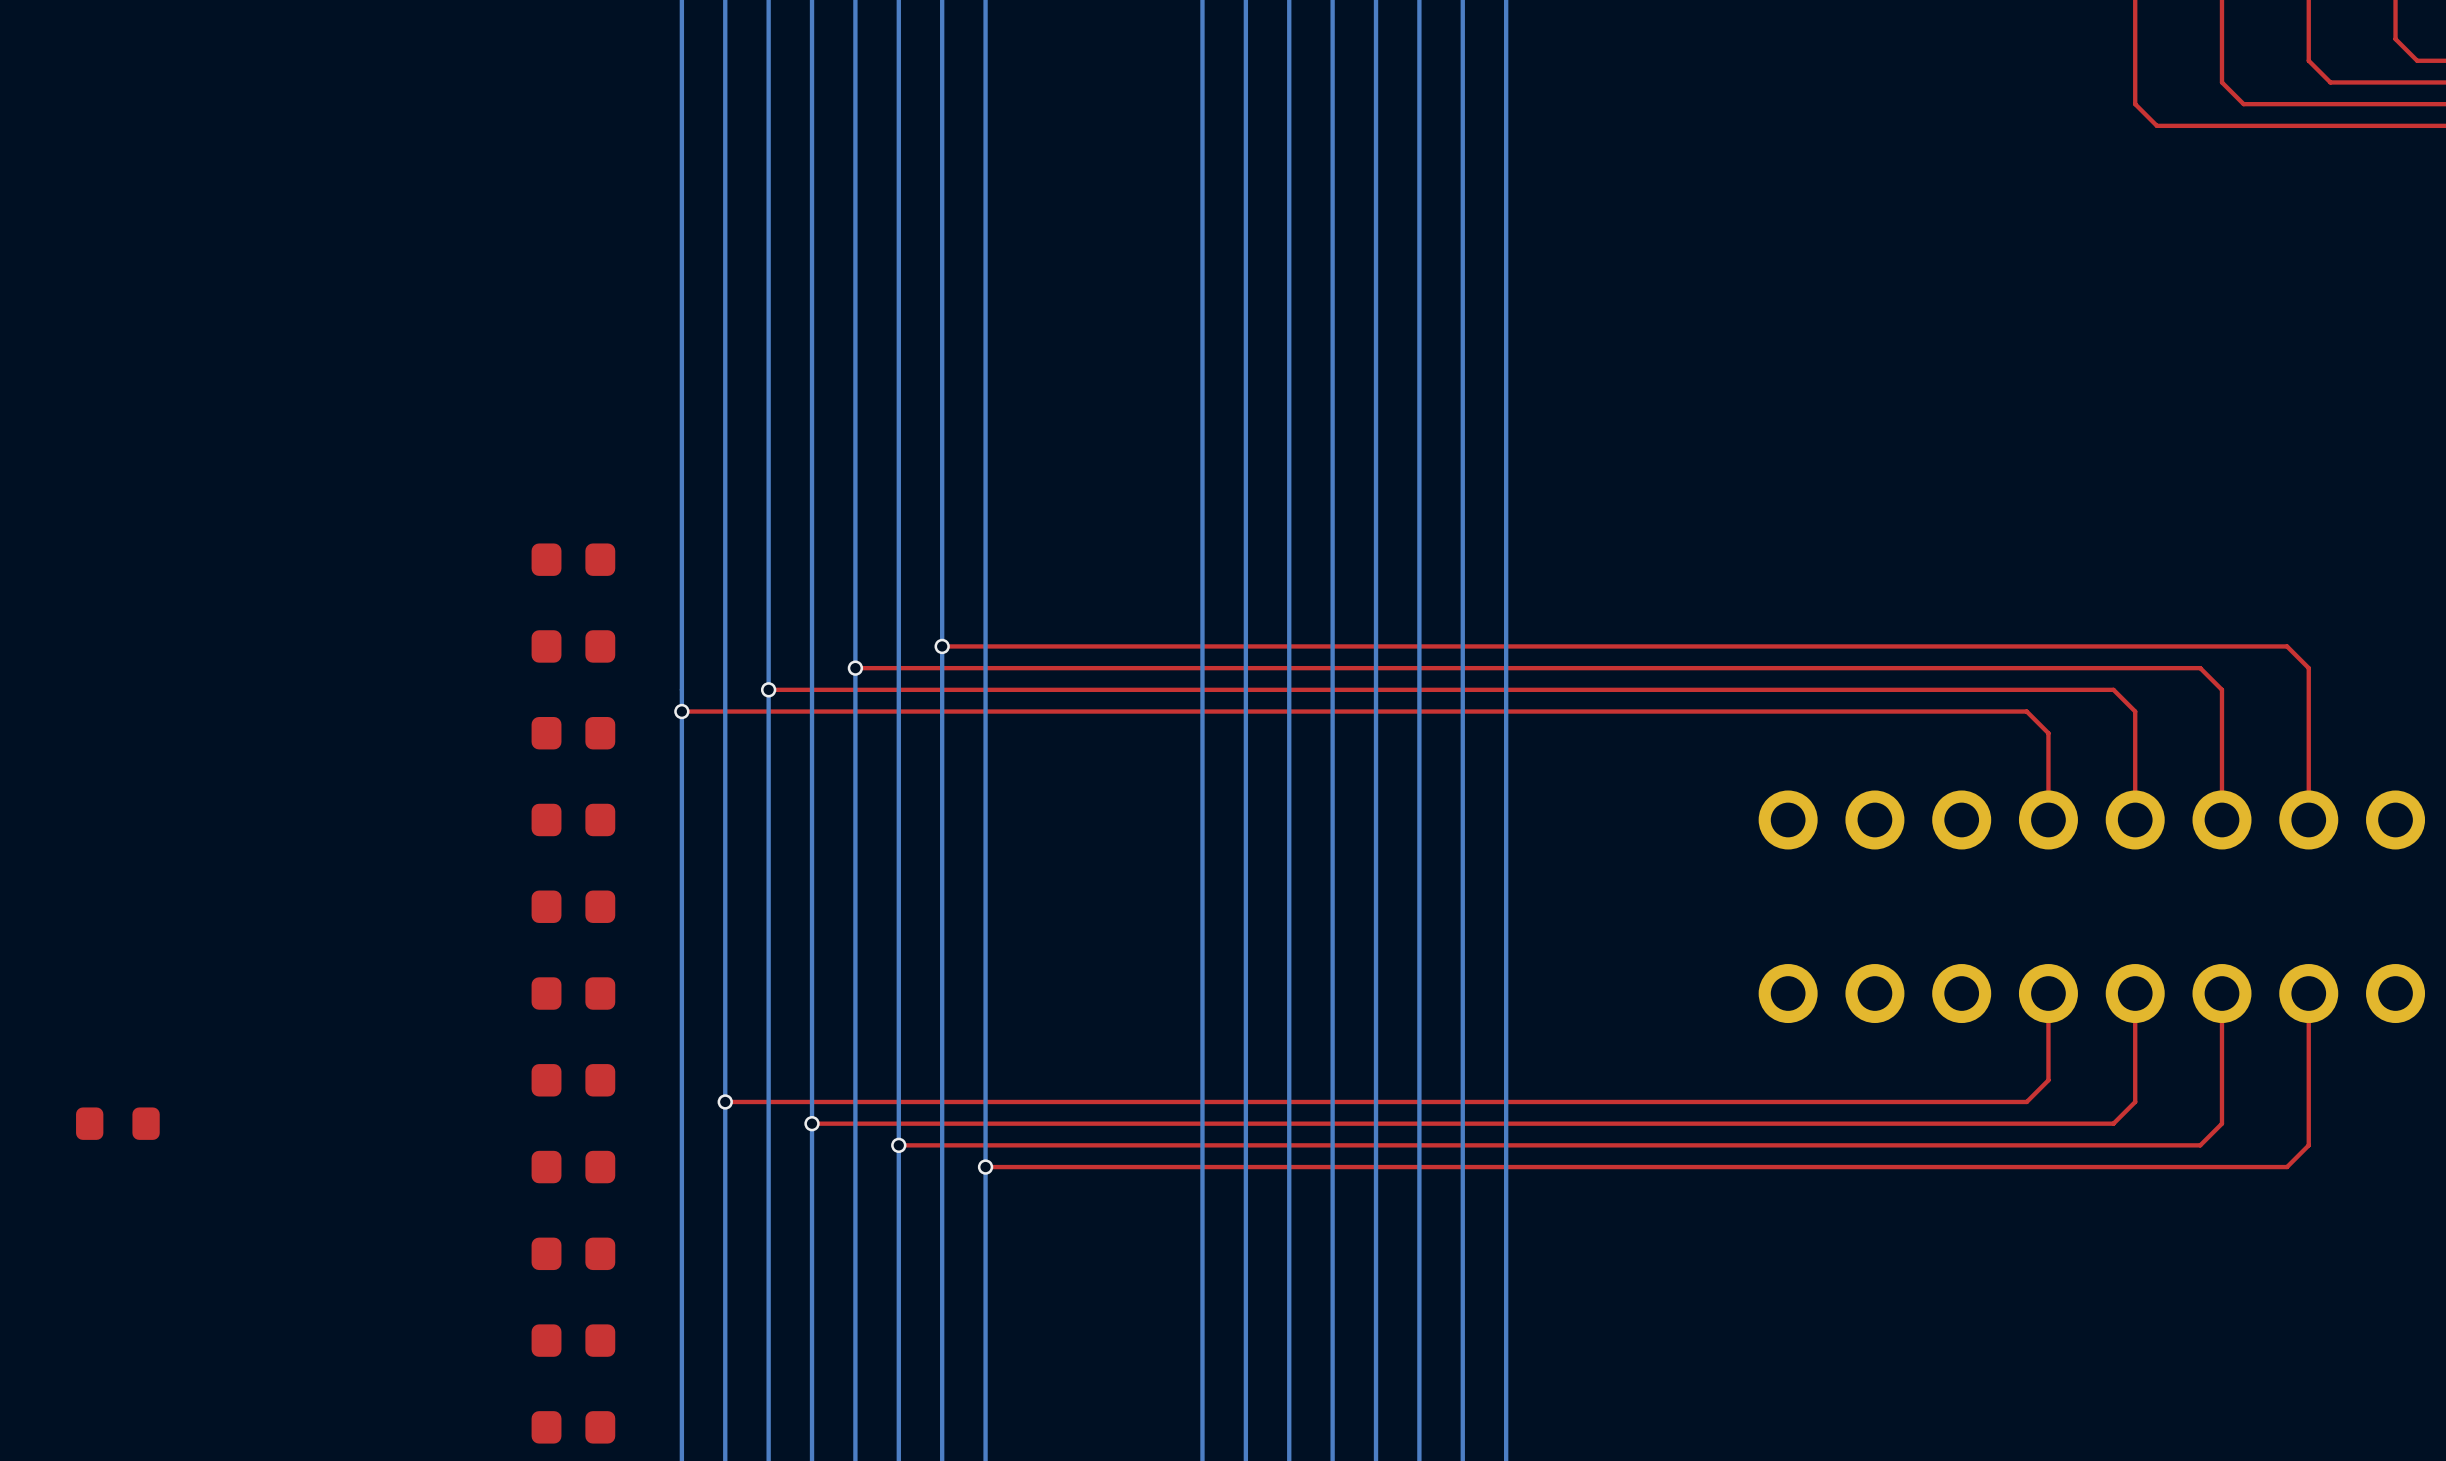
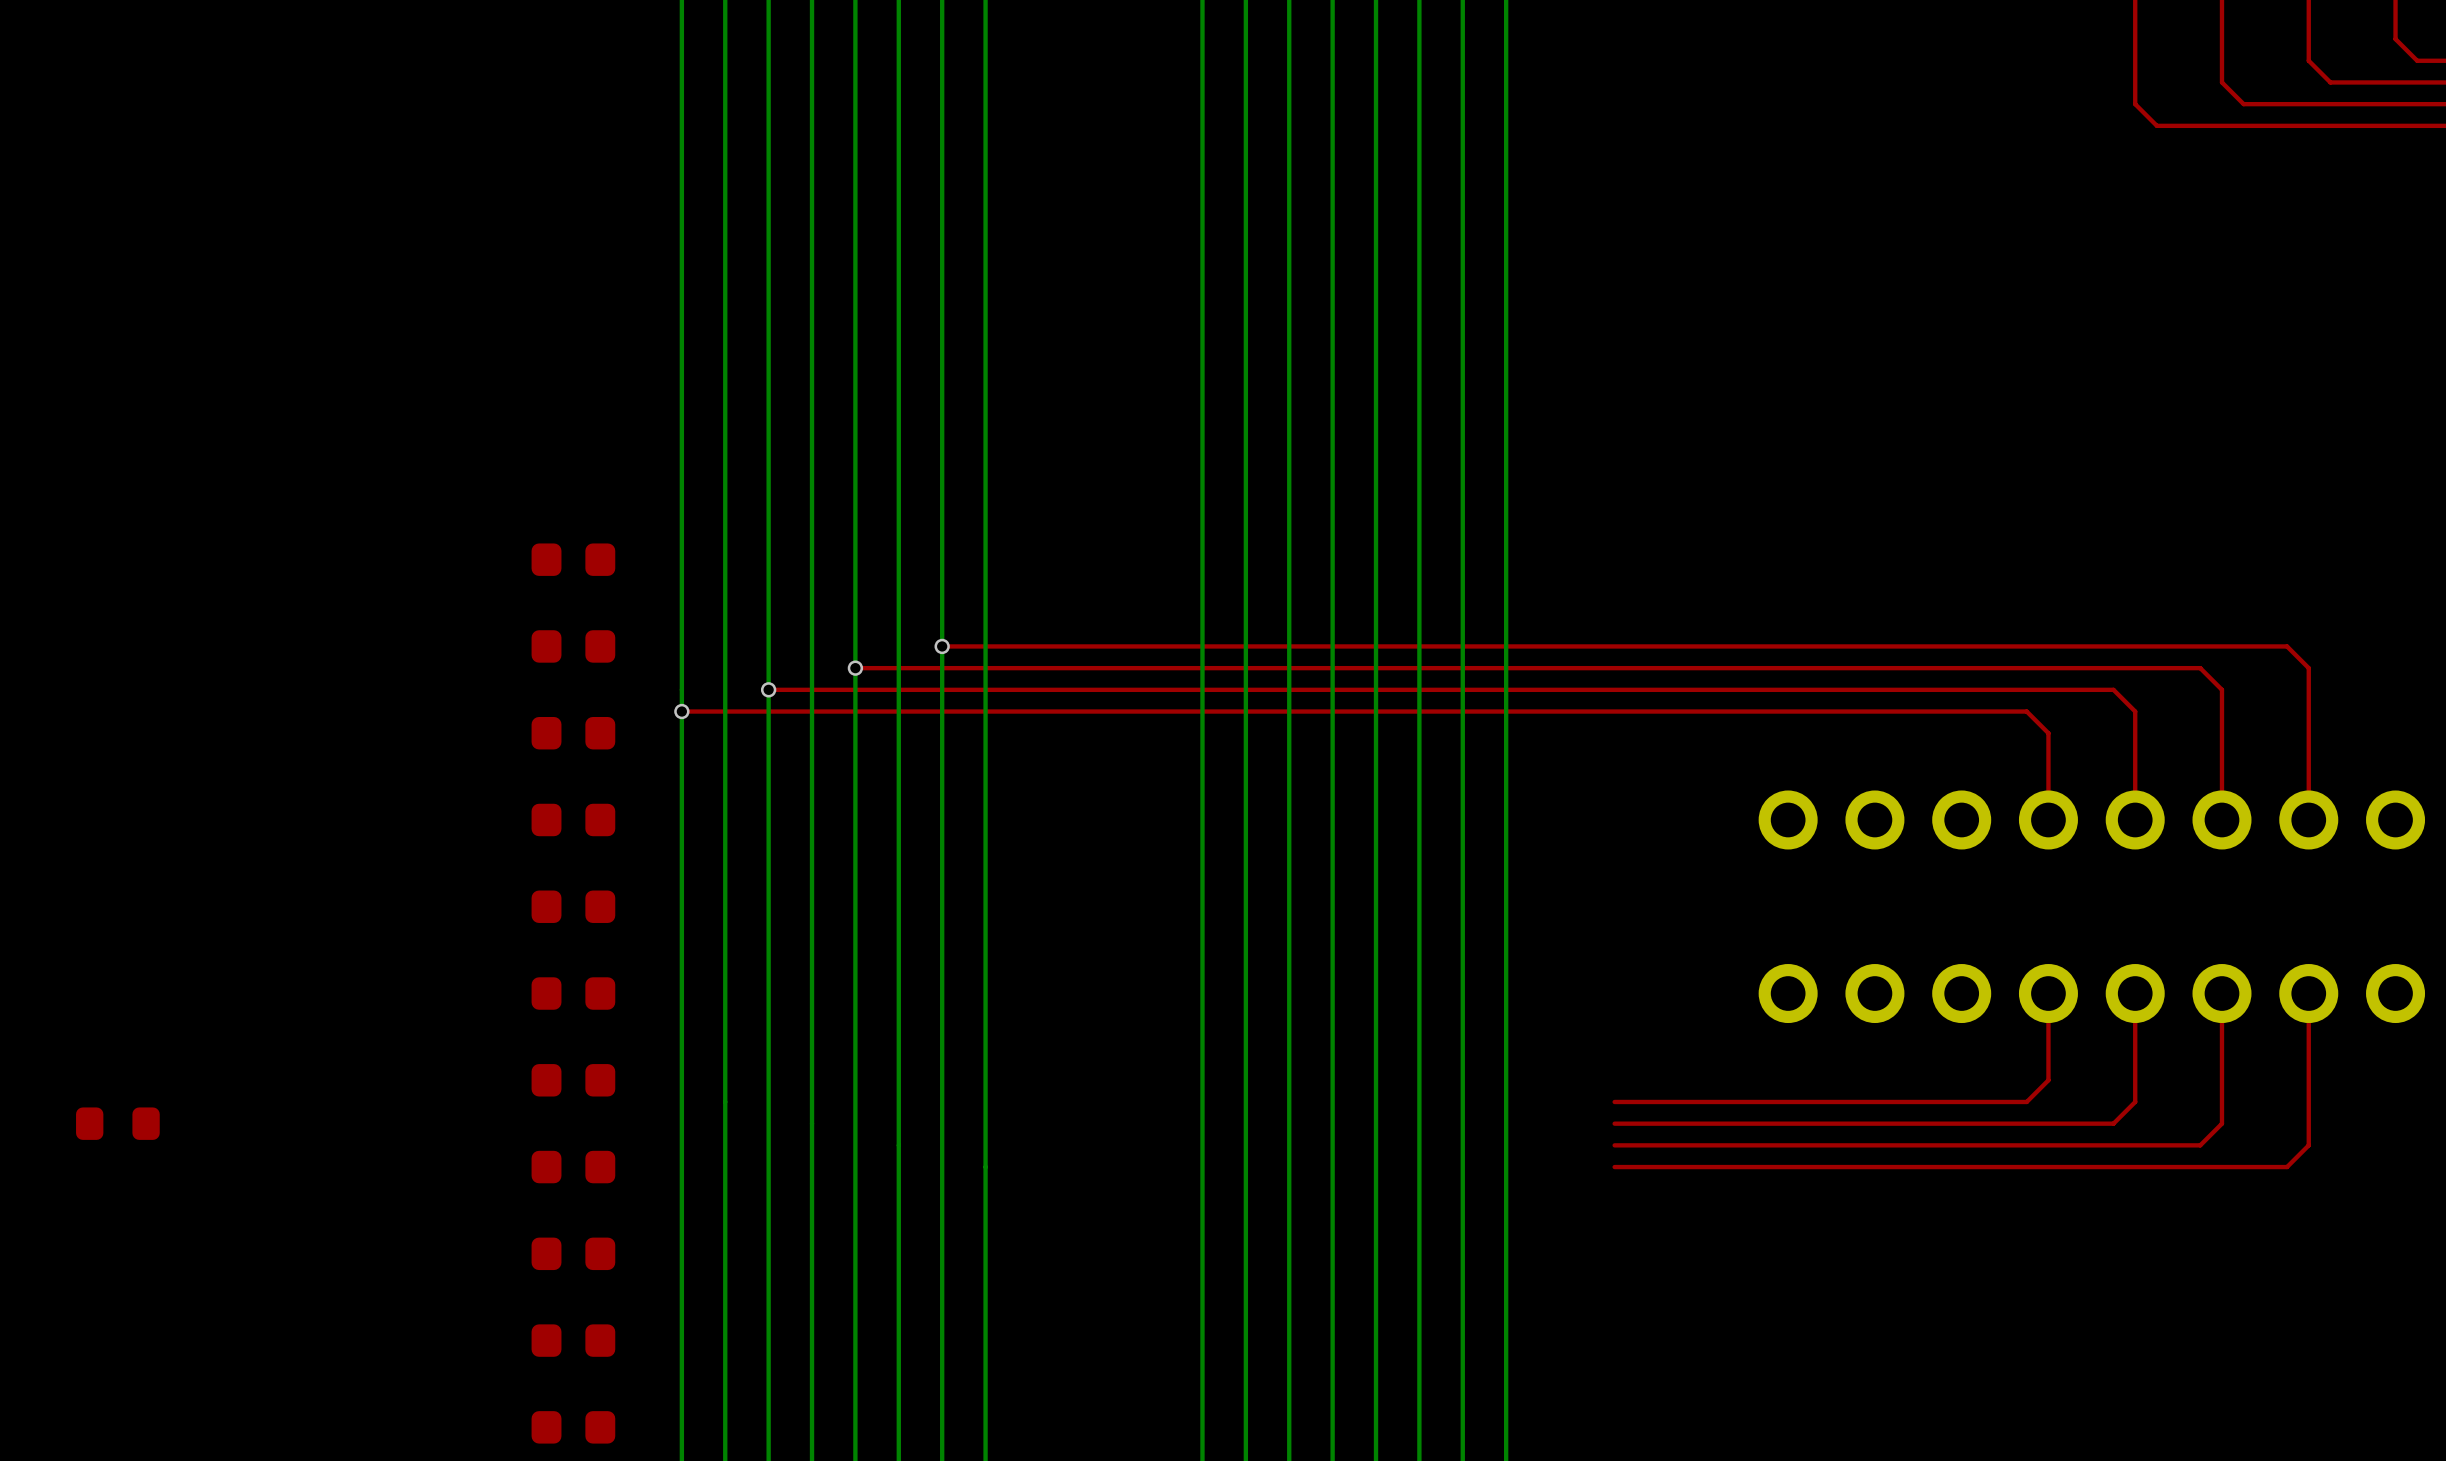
via: (725, 1101) -> none
top track: (1614, 1101) (725, 1101) -> none
via: (812, 1123) -> none
top track: (1614, 1123) (812, 1123) -> none
via: (898, 1145) -> none
top track: (1614, 1145) (898, 1145) -> none
via: (985, 1167) -> none
top track: (1614, 1167) (985, 1167) -> none

